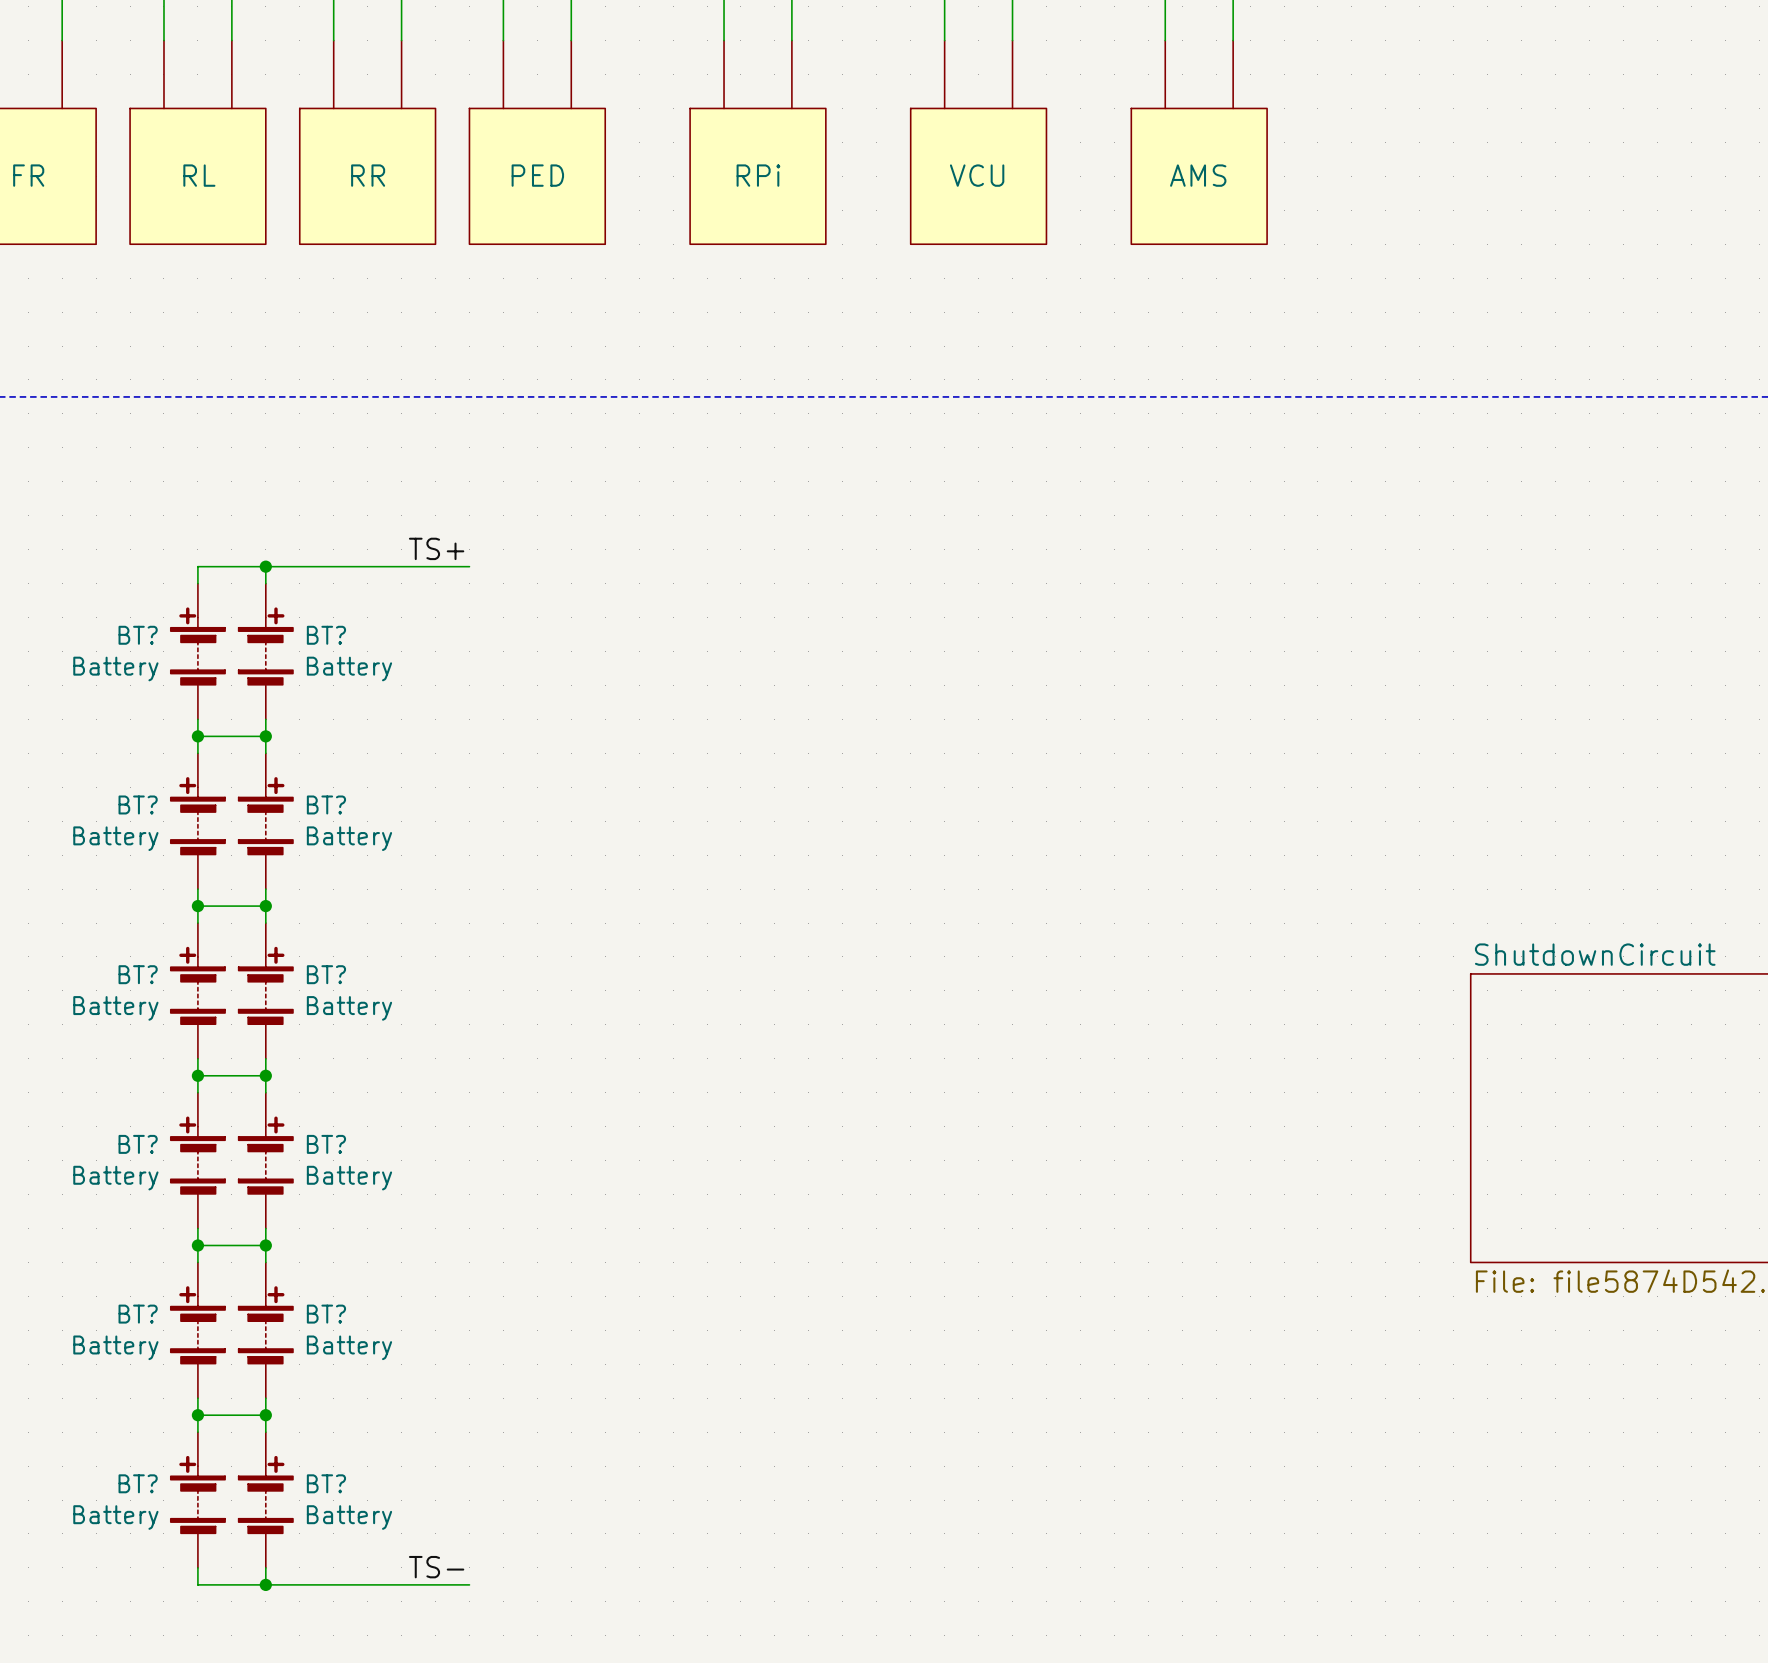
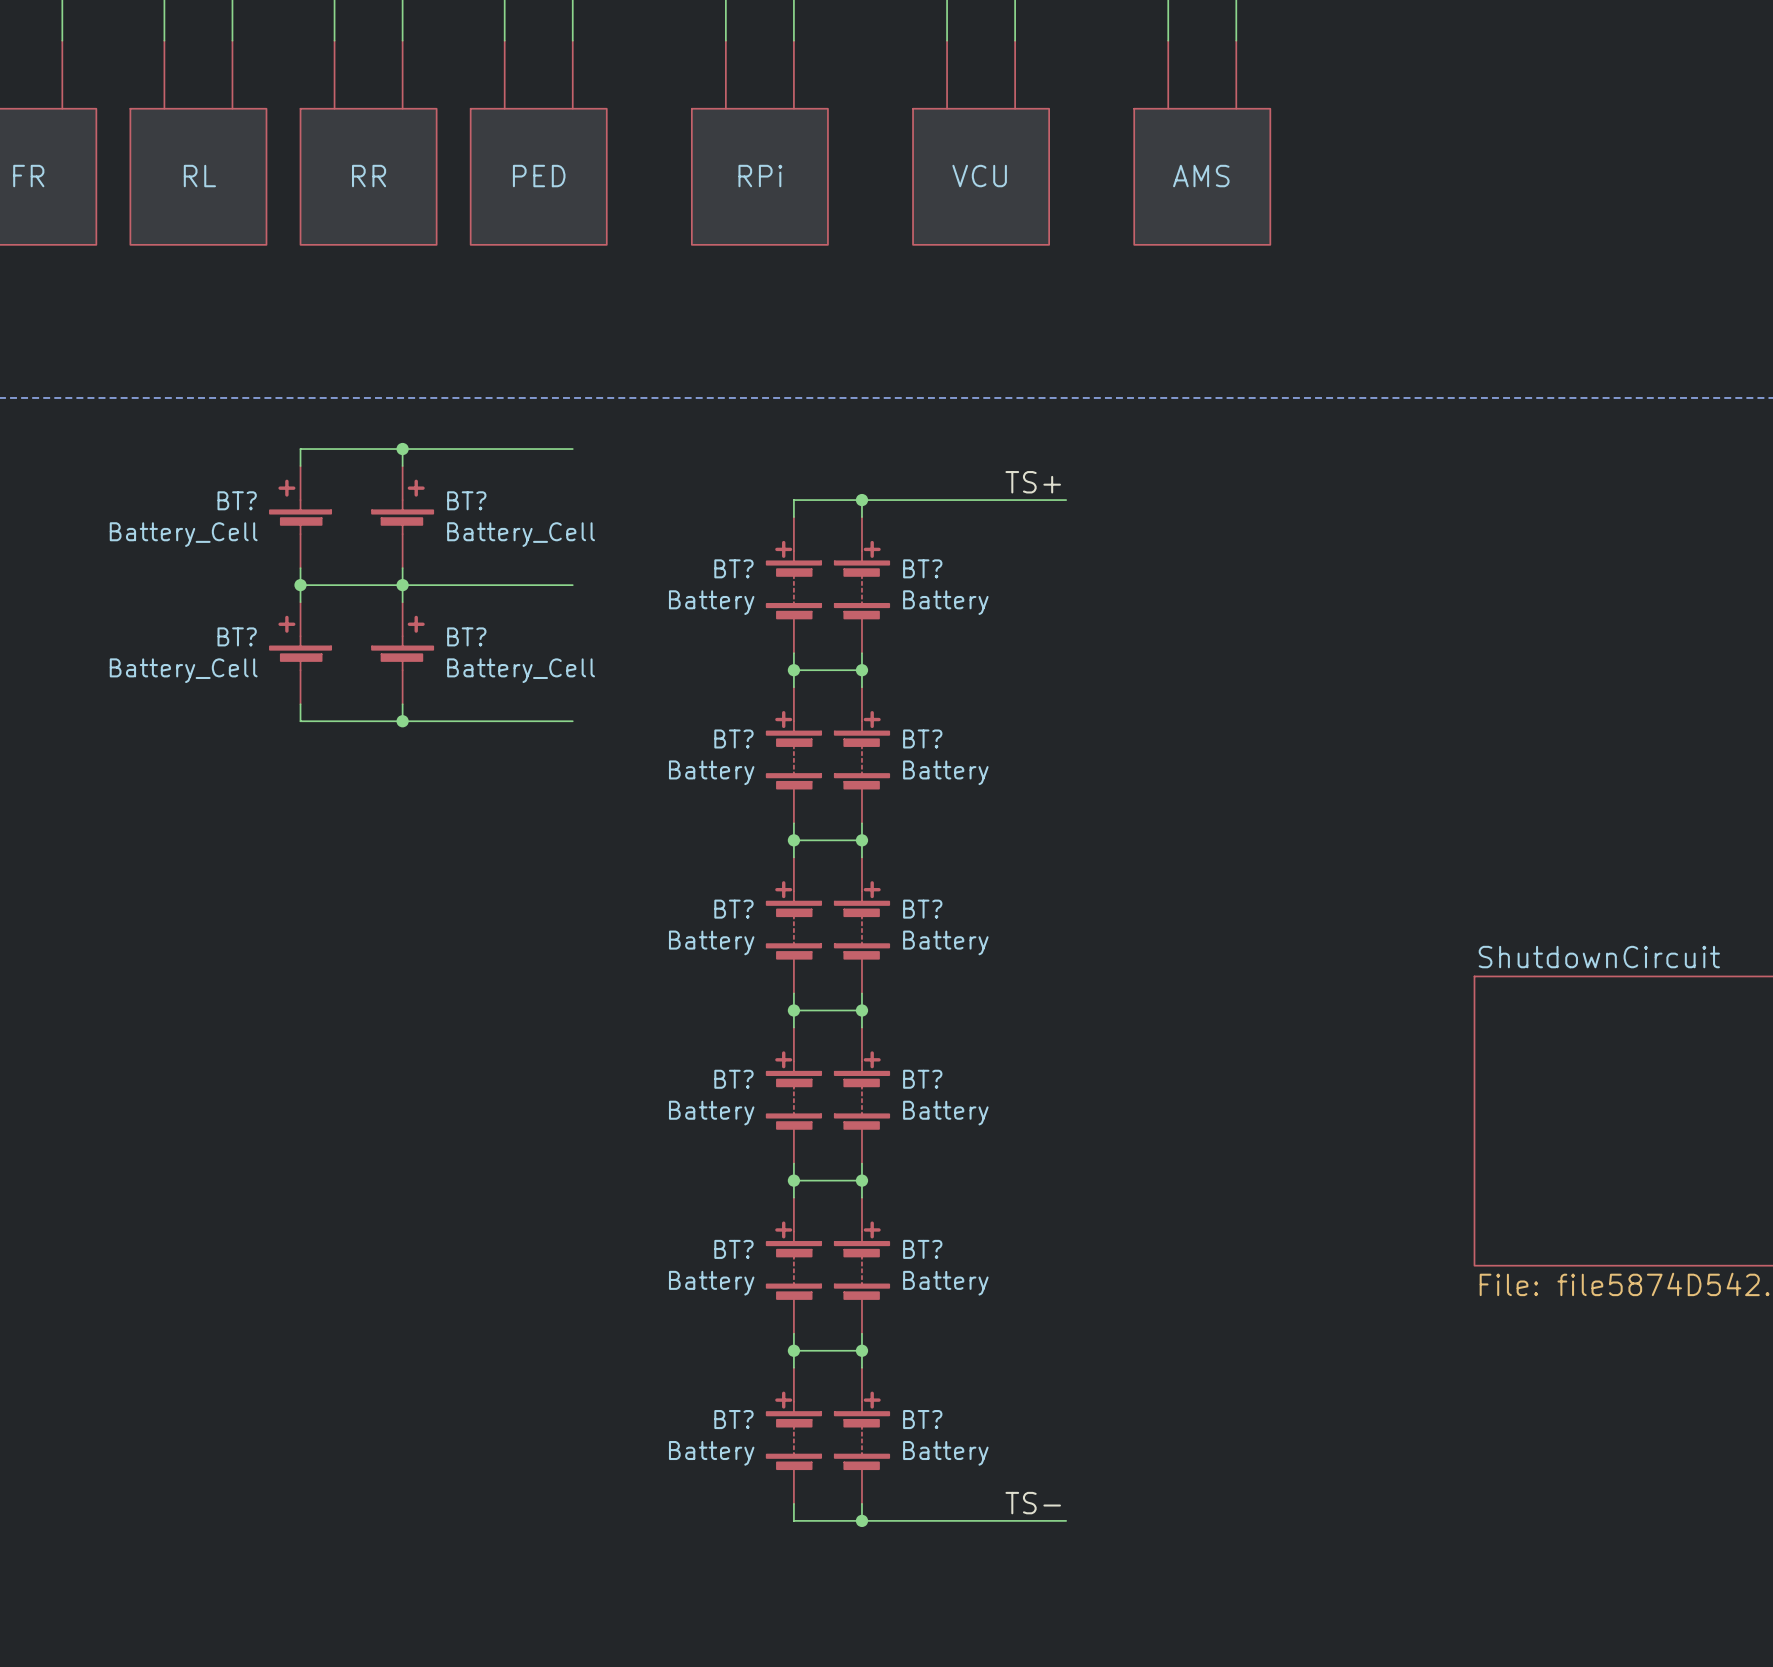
junction: none -> (402, 449)
label: none -> TS+ (1033, 482)
wire: none -> (861, 500) (861, 517)
junction: none -> (861, 500)
wire: none -> (1066, 500) (793, 500) (793, 517)
BT?: none -> Battery_Cell (300, 517)
BT?: none -> Battery_Cell (402, 517)
label: TS+ (436, 548) -> none
wire: (265, 566) (265, 583) -> (402, 449) (402, 466)
junction position: (265, 566) -> (300, 585)
wire: (469, 566) (197, 566) (197, 583) -> (572, 449) (300, 449) (300, 466)
wire: none -> (300, 585) (572, 585)
junction: none -> (402, 585)
BT?: none -> Battery (793, 585)
BT?: none -> Battery (861, 585)
BT?: Battery (197, 651) -> none
BT?: Battery (265, 651) -> none
BT?: none -> Battery_Cell (300, 653)
BT?: none -> Battery_Cell (402, 653)
wire: none -> (793, 653) (793, 687)
wire: none -> (861, 653) (861, 687)
wire: none -> (793, 670) (861, 670)
junction: none -> (793, 670)
junction: none -> (861, 670)
wire: none -> (300, 704) (300, 721) (572, 721)
wire: none -> (402, 704) (402, 721)
wire: (197, 719) (197, 753) -> (402, 568) (402, 602)
wire: (265, 719) (265, 753) -> (300, 568) (300, 602)
junction: none -> (402, 721)
wire: (197, 736) (265, 736) -> none
junction: (197, 736) -> none
junction: (265, 736) -> none
BT?: none -> Battery (793, 755)
BT?: none -> Battery (861, 755)
BT?: Battery (197, 821) -> none
BT?: Battery (265, 821) -> none
wire: none -> (793, 823) (793, 857)
wire: none -> (861, 823) (861, 857)
wire: none -> (793, 840) (861, 840)
junction: none -> (793, 840)
junction: none -> (861, 840)
wire: (197, 889) (197, 923) -> none
wire: (265, 889) (265, 923) -> none
wire: (197, 906) (265, 906) -> none
junction: (197, 906) -> none
junction: (265, 906) -> none
BT?: none -> Battery (793, 925)
BT?: none -> Battery (861, 925)
BT?: Battery (197, 990) -> none
BT?: Battery (265, 990) -> none
wire: none -> (793, 993) (793, 1027)
wire: none -> (861, 993) (861, 1027)
wire: none -> (793, 1010) (861, 1010)
junction: none -> (793, 1010)
junction: none -> (861, 1010)
wire: (197, 1058) (197, 1092) -> none
wire: (265, 1058) (265, 1092) -> none
wire: (197, 1075) (265, 1075) -> none
junction: (197, 1075) -> none
junction: (265, 1075) -> none
BT?: none -> Battery (793, 1095)
BT?: none -> Battery (861, 1095)
BT?: Battery (197, 1160) -> none
BT?: Battery (265, 1160) -> none
wire: none -> (793, 1163) (793, 1197)
wire: none -> (861, 1163) (861, 1197)
wire: none -> (793, 1180) (861, 1180)
junction: none -> (793, 1180)
junction: none -> (861, 1180)
wire: (197, 1228) (197, 1262) -> none
wire: (265, 1228) (265, 1262) -> none
wire: (197, 1245) (265, 1245) -> none
junction: (197, 1245) -> none
junction: (265, 1245) -> none
BT?: none -> Battery (793, 1265)
BT?: none -> Battery (861, 1265)
BT?: Battery (197, 1330) -> none
BT?: Battery (265, 1330) -> none
wire: none -> (793, 1333) (793, 1367)
wire: none -> (861, 1333) (861, 1367)
wire: none -> (793, 1350) (861, 1350)
junction: none -> (793, 1350)
junction: none -> (861, 1350)
wire: (197, 1398) (197, 1432) -> none
wire: (265, 1398) (265, 1432) -> none
wire: (197, 1415) (265, 1415) -> none
junction: (197, 1415) -> none
junction: (265, 1415) -> none
BT?: none -> Battery (793, 1435)
BT?: none -> Battery (861, 1435)
label: none -> TS- (1033, 1503)
BT?: Battery (197, 1500) -> none
BT?: Battery (265, 1500) -> none
wire: none -> (793, 1503) (793, 1520) (1066, 1520)
wire: none -> (861, 1503) (861, 1520)
junction: none -> (861, 1520)
wire: (197, 1567) (197, 1584) (469, 1584) -> none
wire: (265, 1567) (265, 1584) -> none
label: TS- (436, 1567) -> none
junction: (265, 1584) -> none

